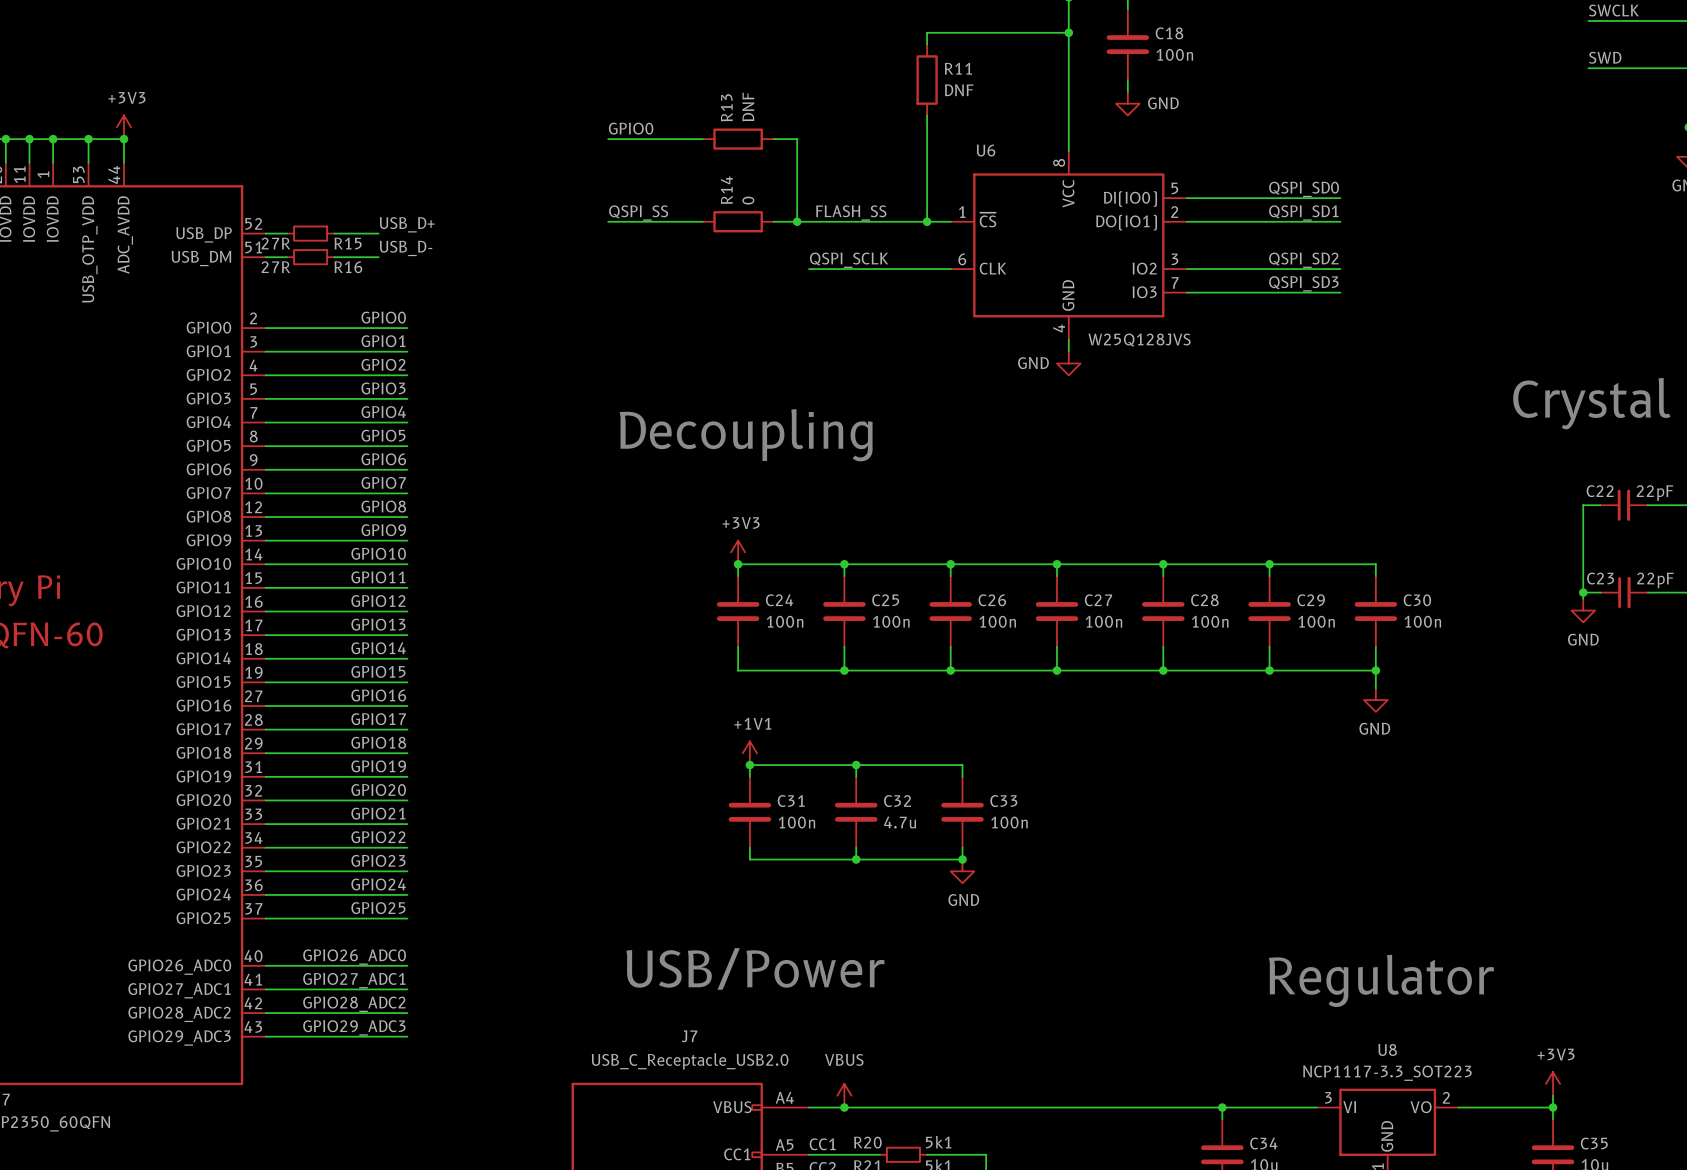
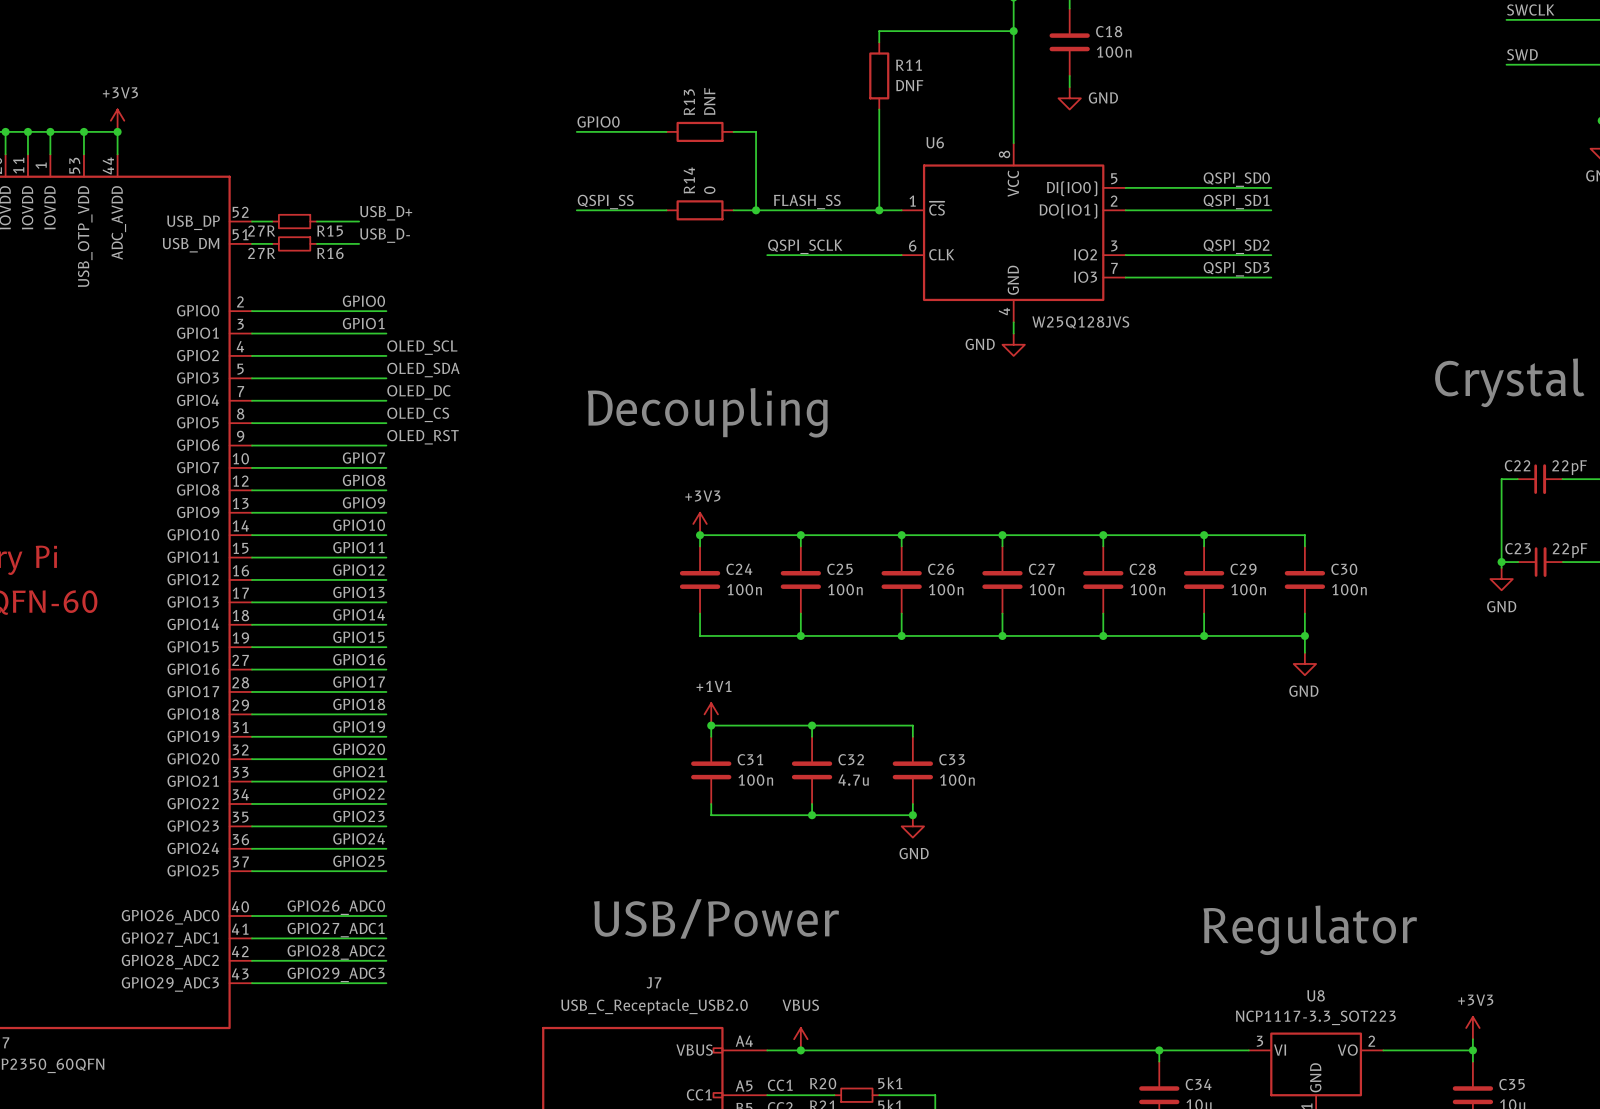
label: GPIO2 (383, 364) -> OLED_SCL (422, 347)
label: GPIO3 (383, 388) -> OLED_SDA (423, 370)
label: GPIO4 (383, 412) -> OLED_DC (419, 392)
label: GPIO5 (383, 435) -> OLED_CS (418, 414)
label: GPIO6 (383, 459) -> OLED_RST (423, 437)

